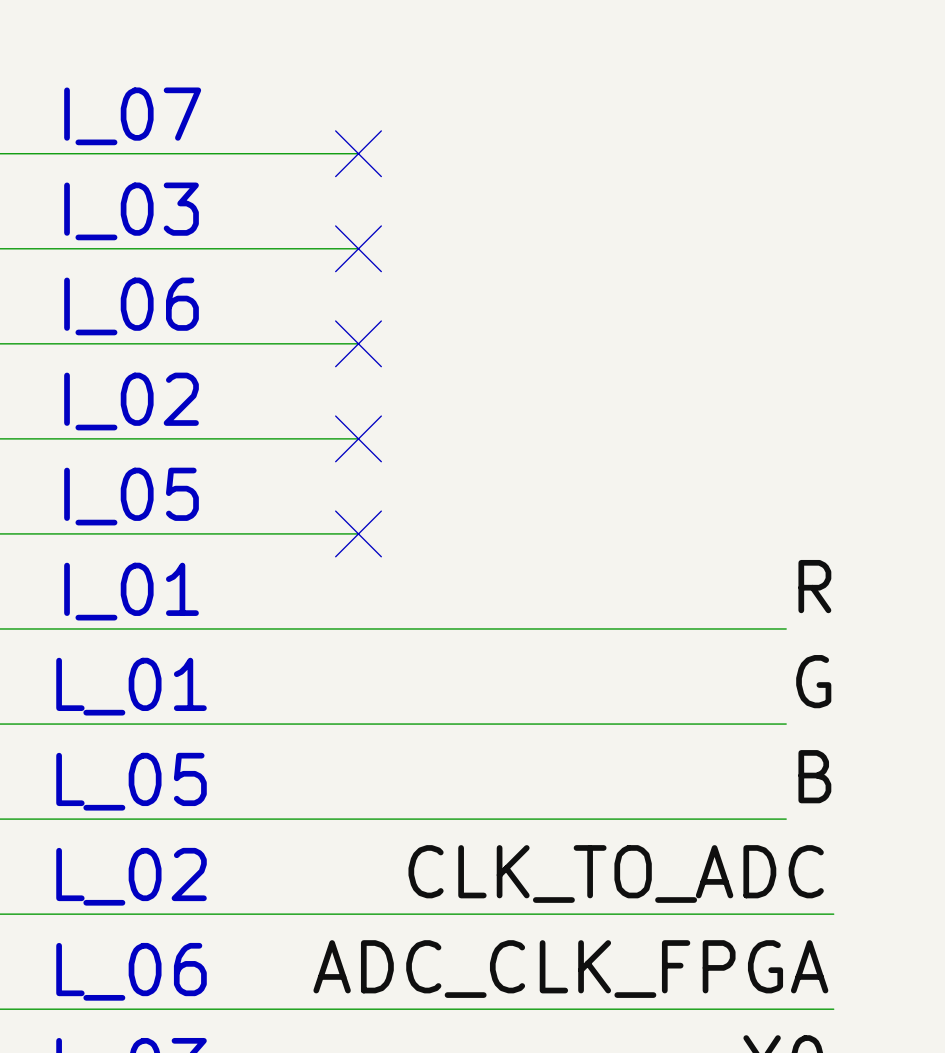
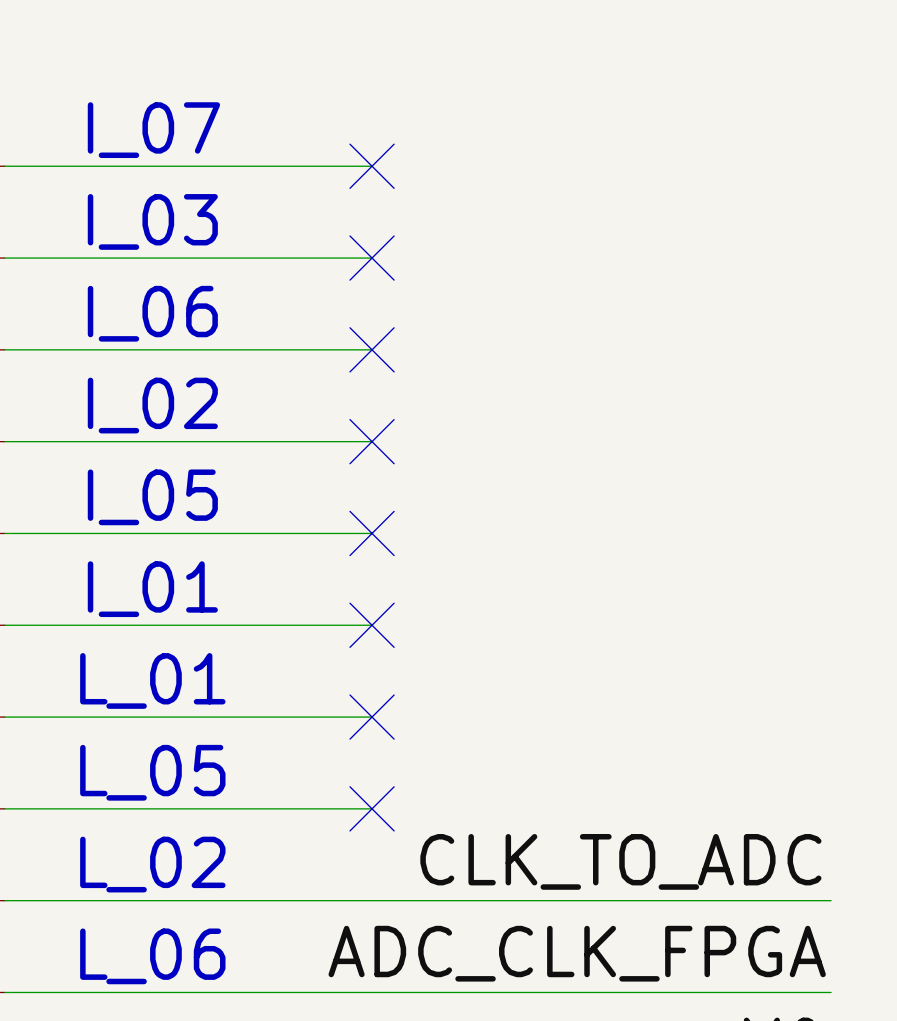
label: R (814, 586) -> none
wire: (358, 628) (786, 628) -> none
no-connect mark: none -> (372, 625)
label: G (813, 681) -> none
wire: (358, 724) (786, 724) -> none
no-connect mark: none -> (372, 717)
label: B (814, 776) -> none
wire: (358, 819) (786, 819) -> none
no-connect mark: none -> (372, 808)

